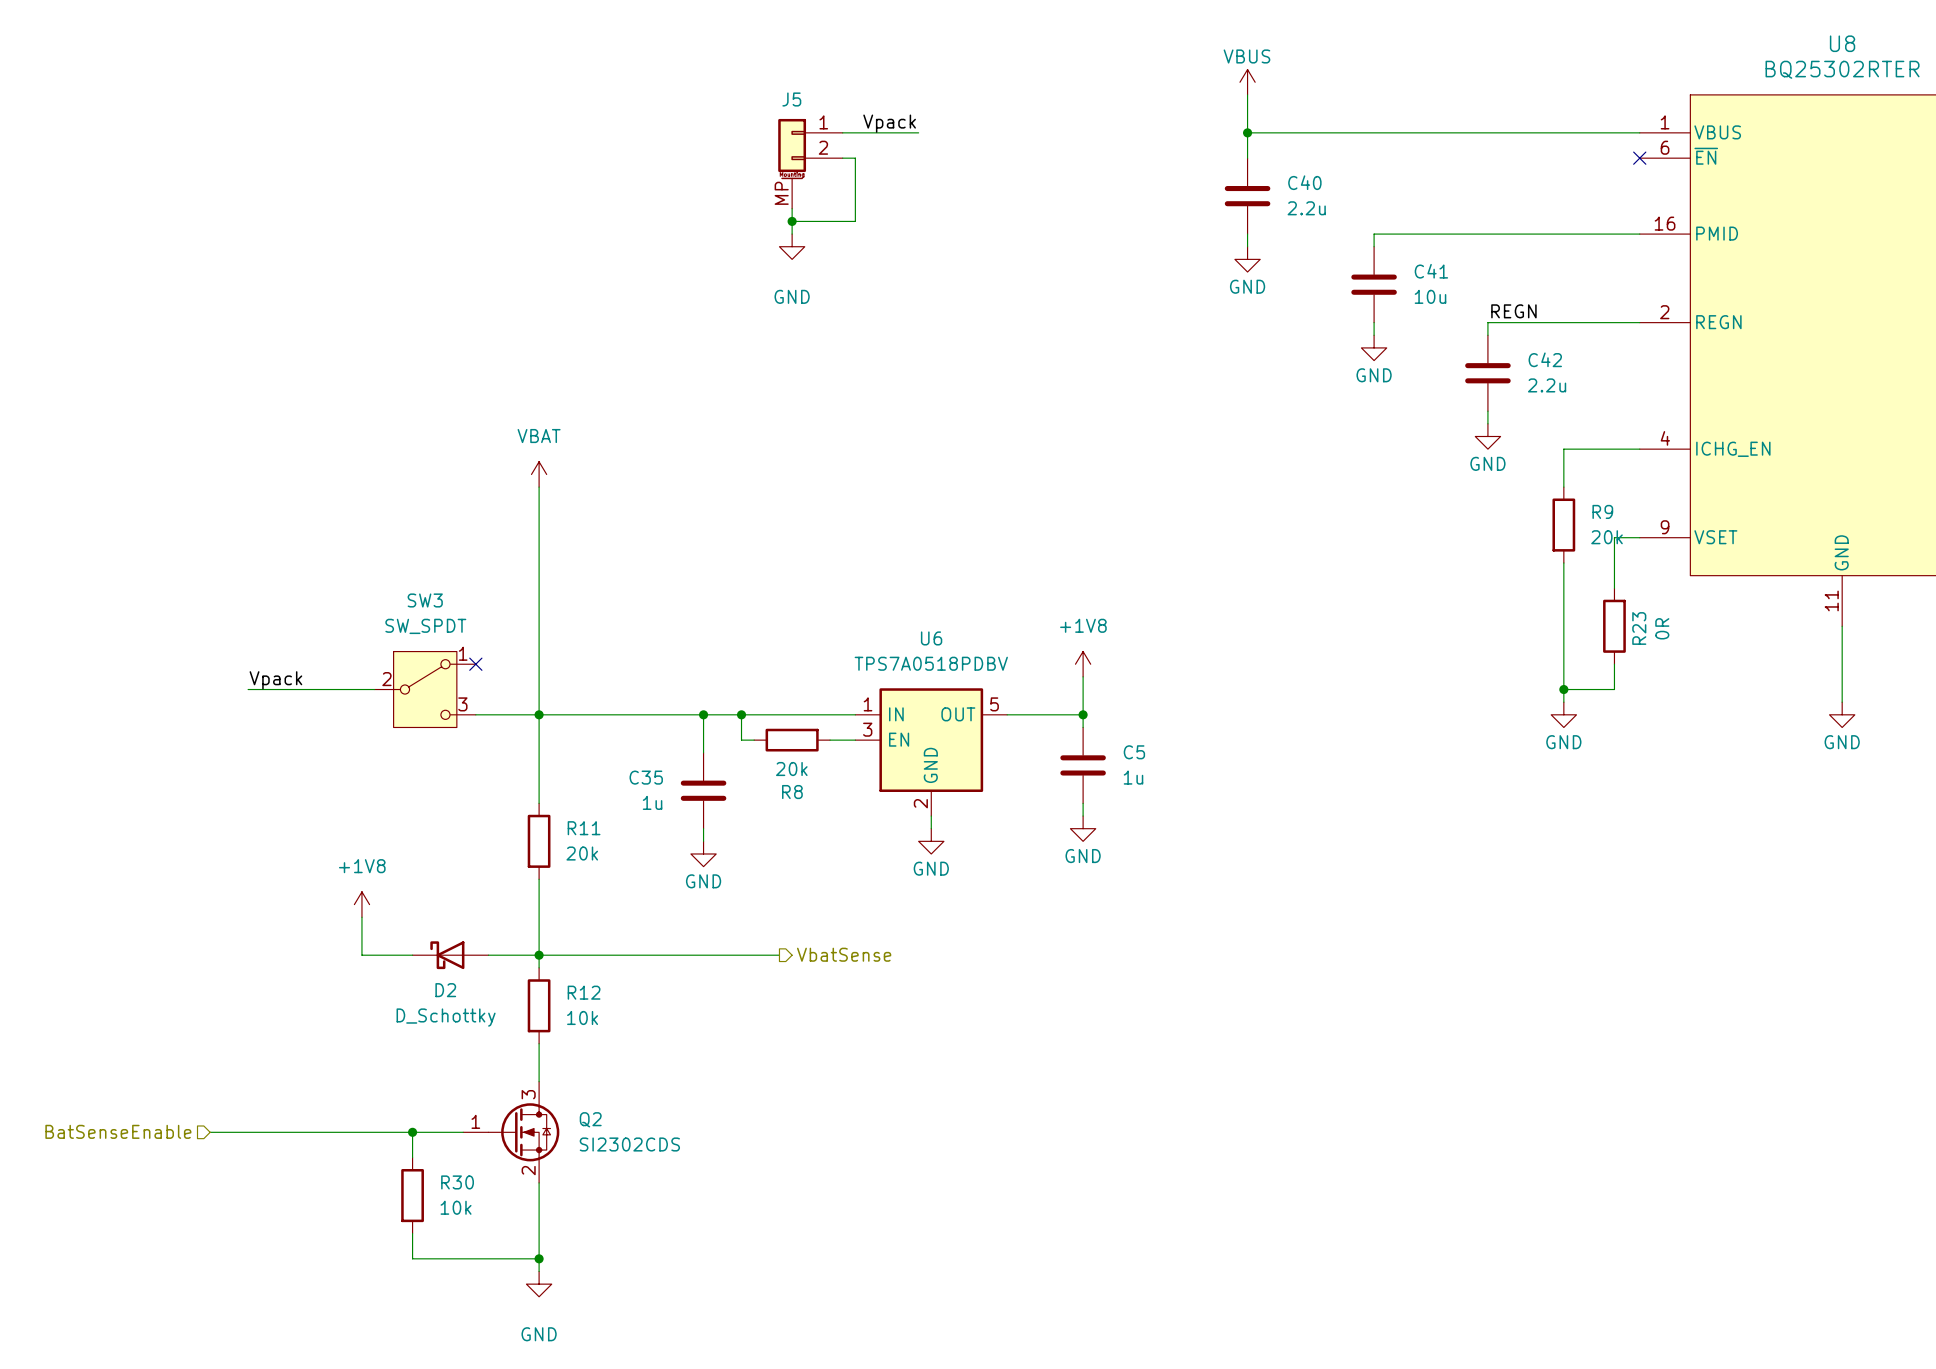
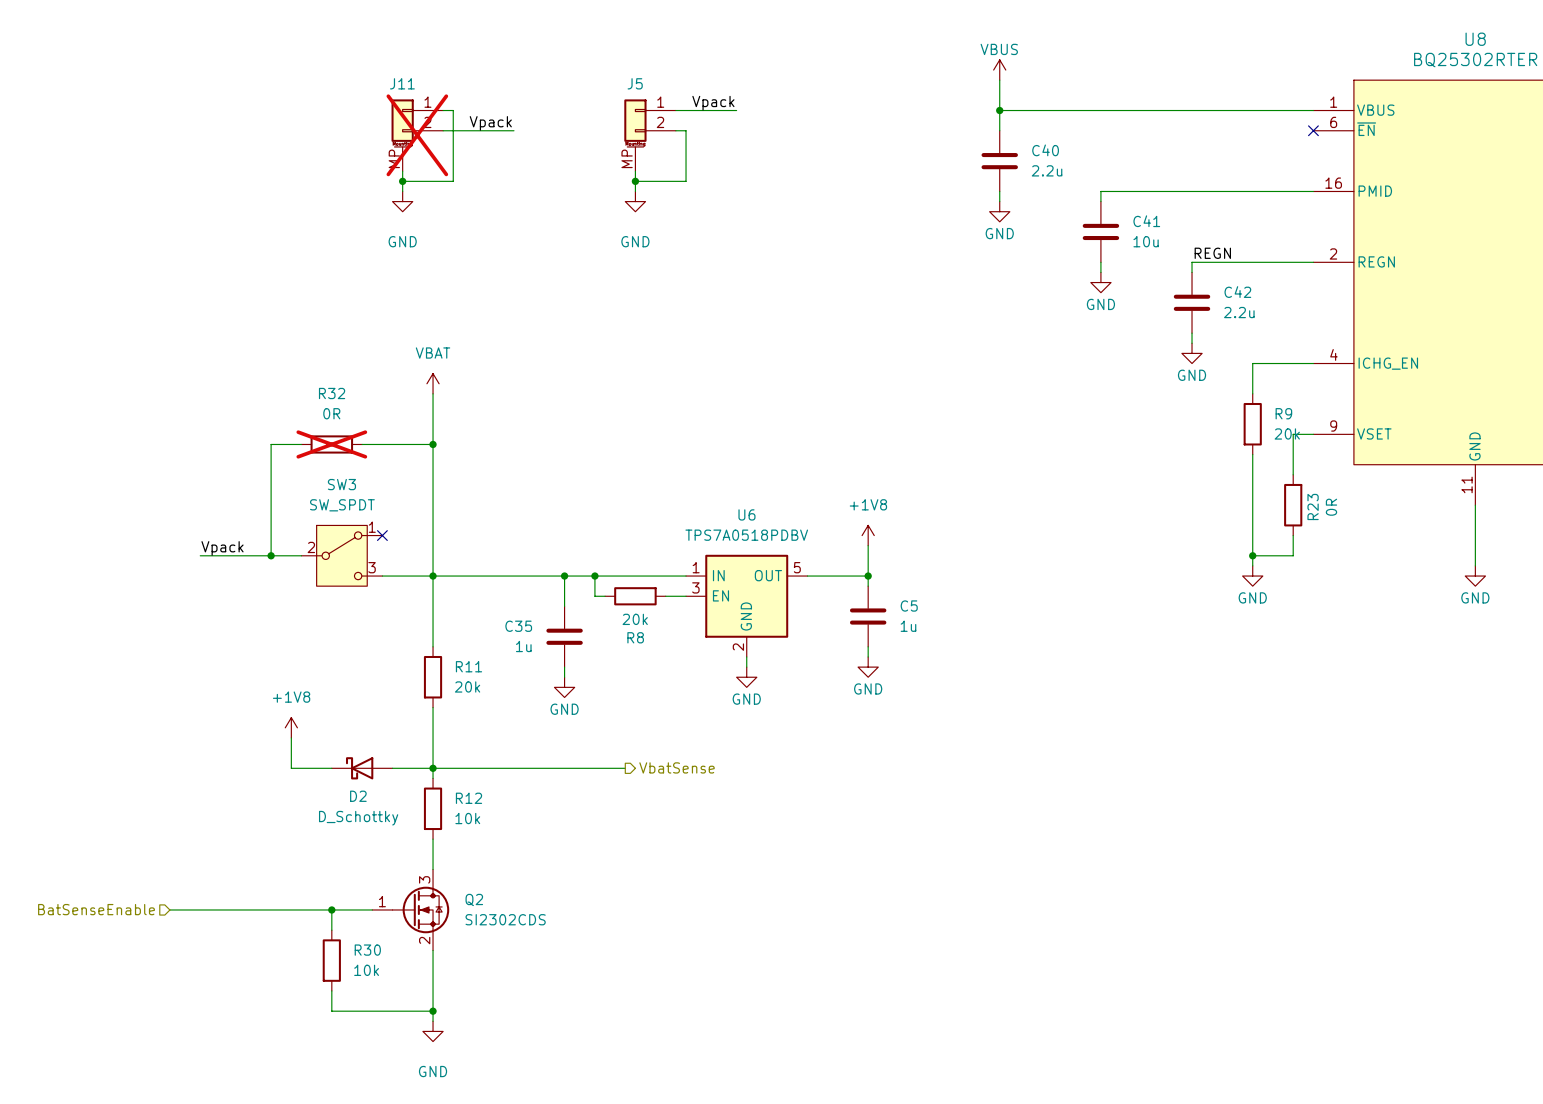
wire: none -> (443, 110) (453, 110) (453, 181) (402, 181)
label: none -> Vpack (490, 123)
wire: none -> (443, 130) (513, 130)
J11: none -> (417, 135)
wire: none -> (402, 171) (402, 191)
junction: none -> (402, 181)
power symbol: none -> GND (402, 201)
wire: none -> (301, 444) (271, 444) (271, 555)
R32: none -> 0R (331, 444)
wire: none -> (362, 444) (433, 444)
junction: none -> (433, 444)
junction: none -> (271, 555)

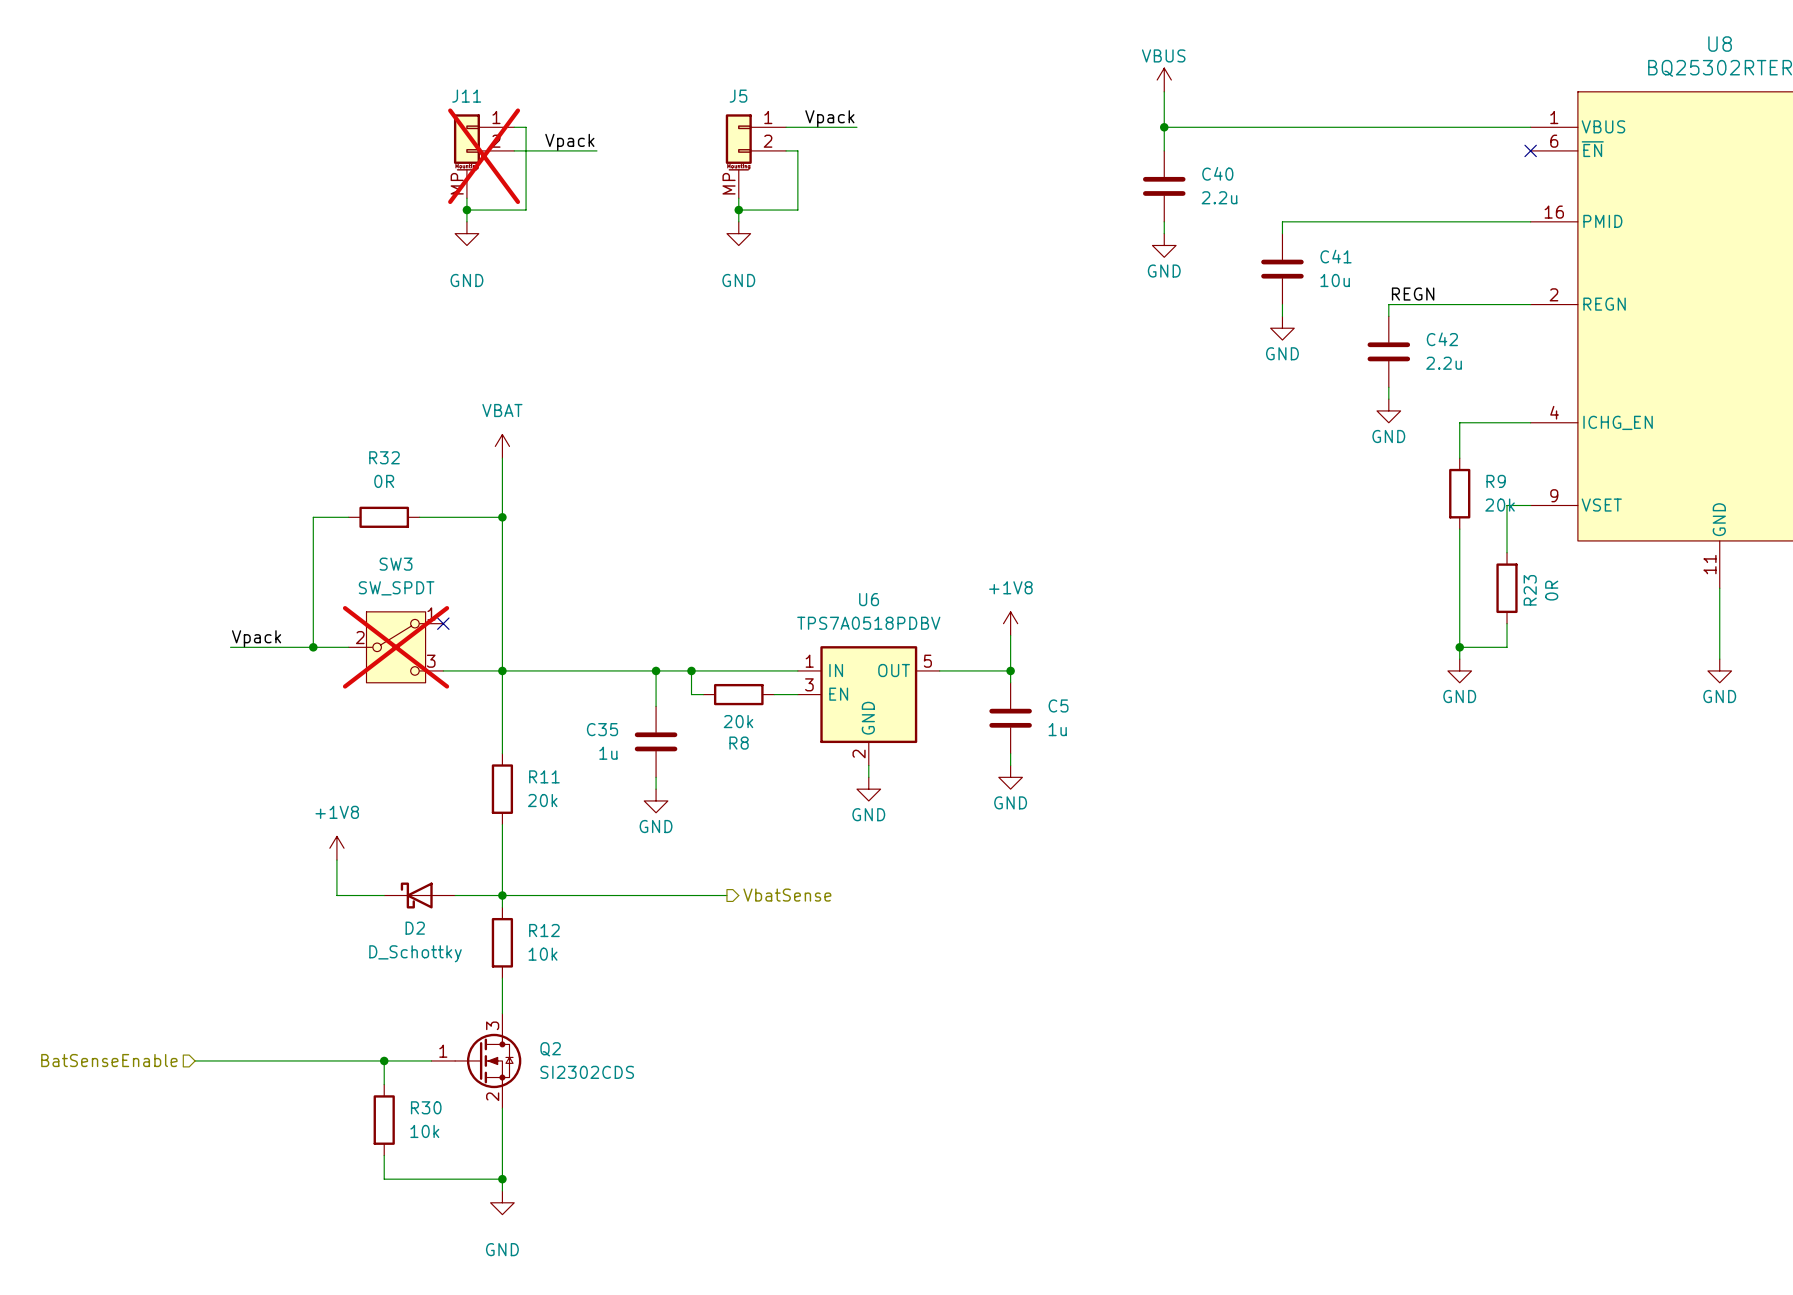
R32 do-not-place cross: (331, 444) -> none
SW3 do-not-place cross: none -> (396, 647)

